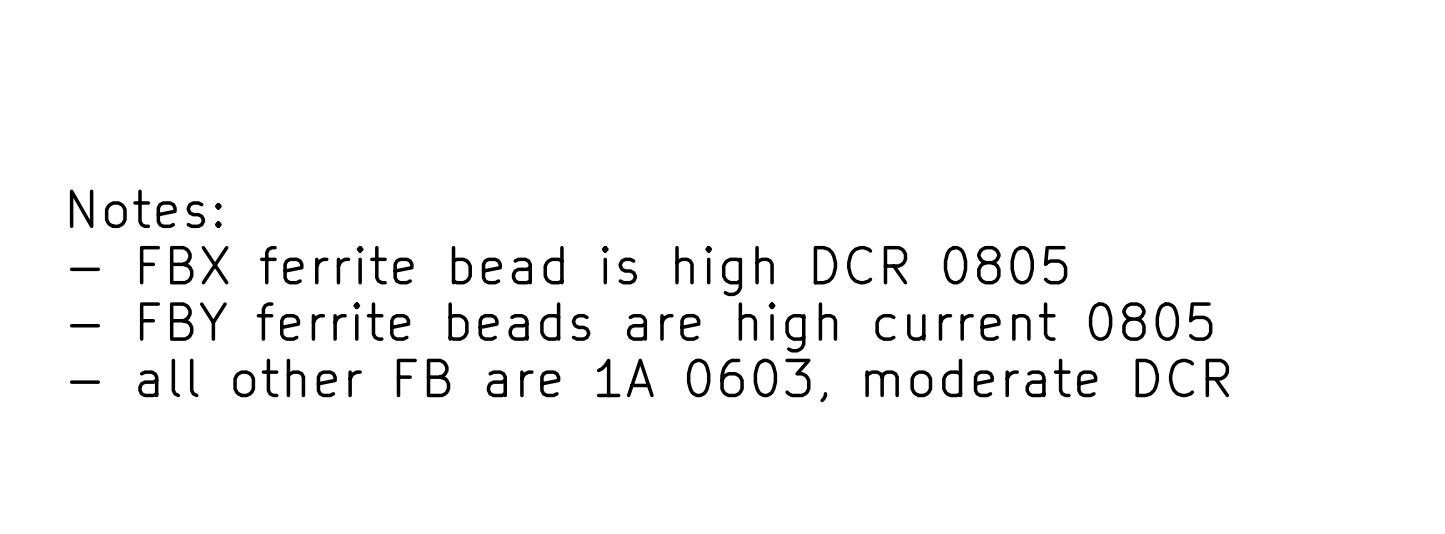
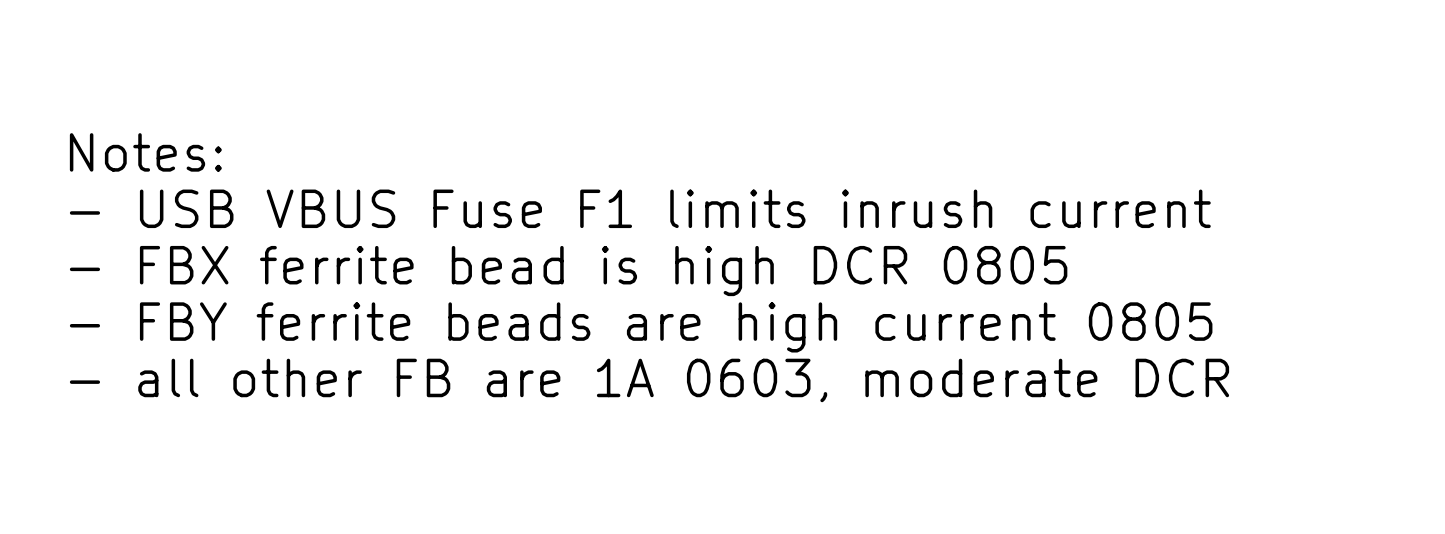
text: none -> Notes: (145, 152)
text: Notes: (145, 208) -> - USB VBUS Fuse F1 limits inrush current (640, 208)

